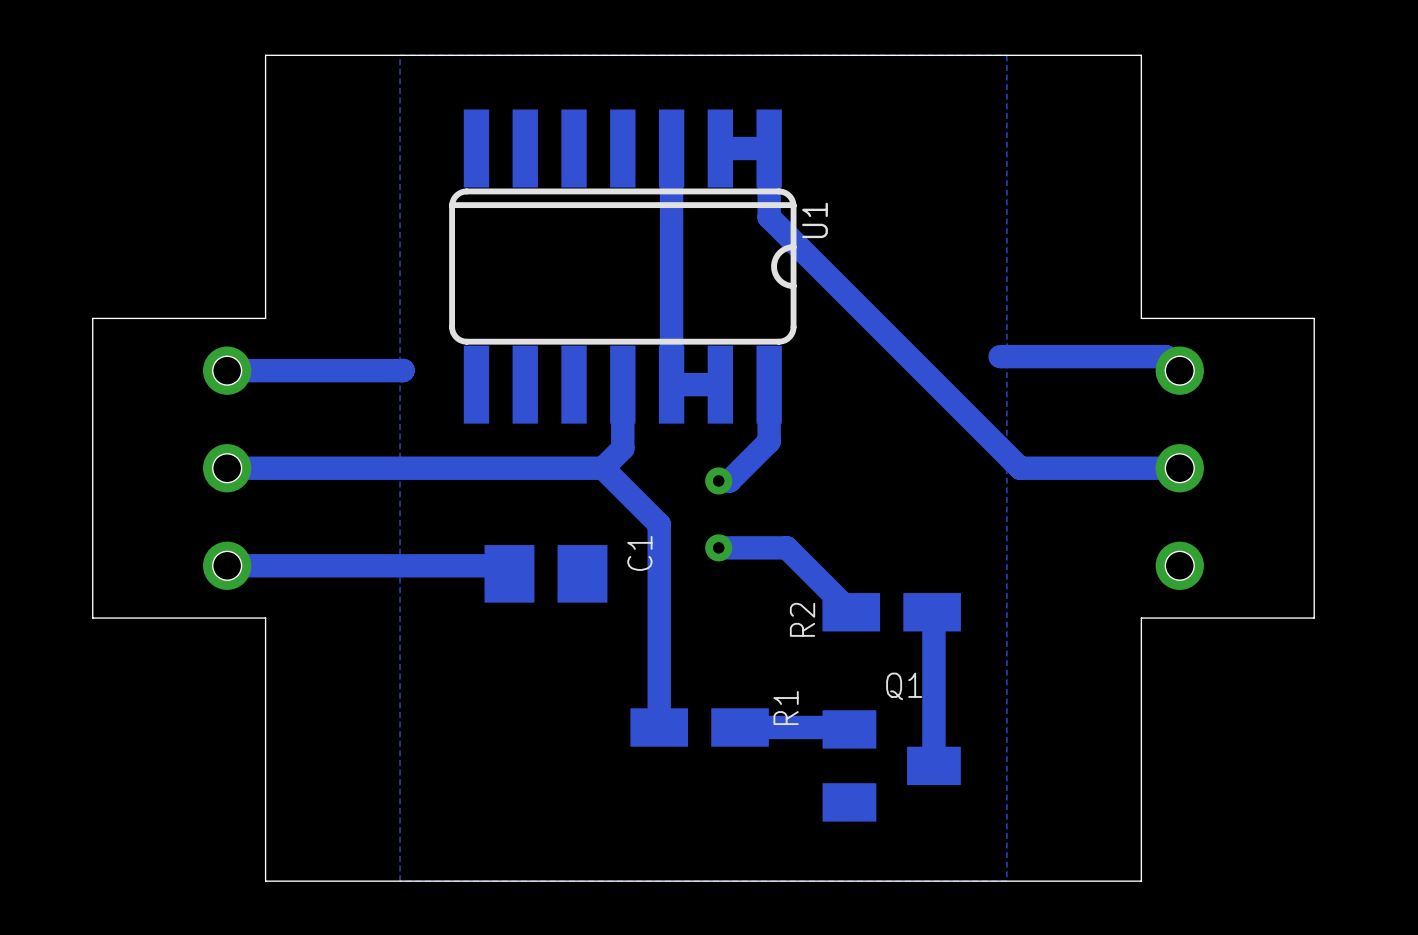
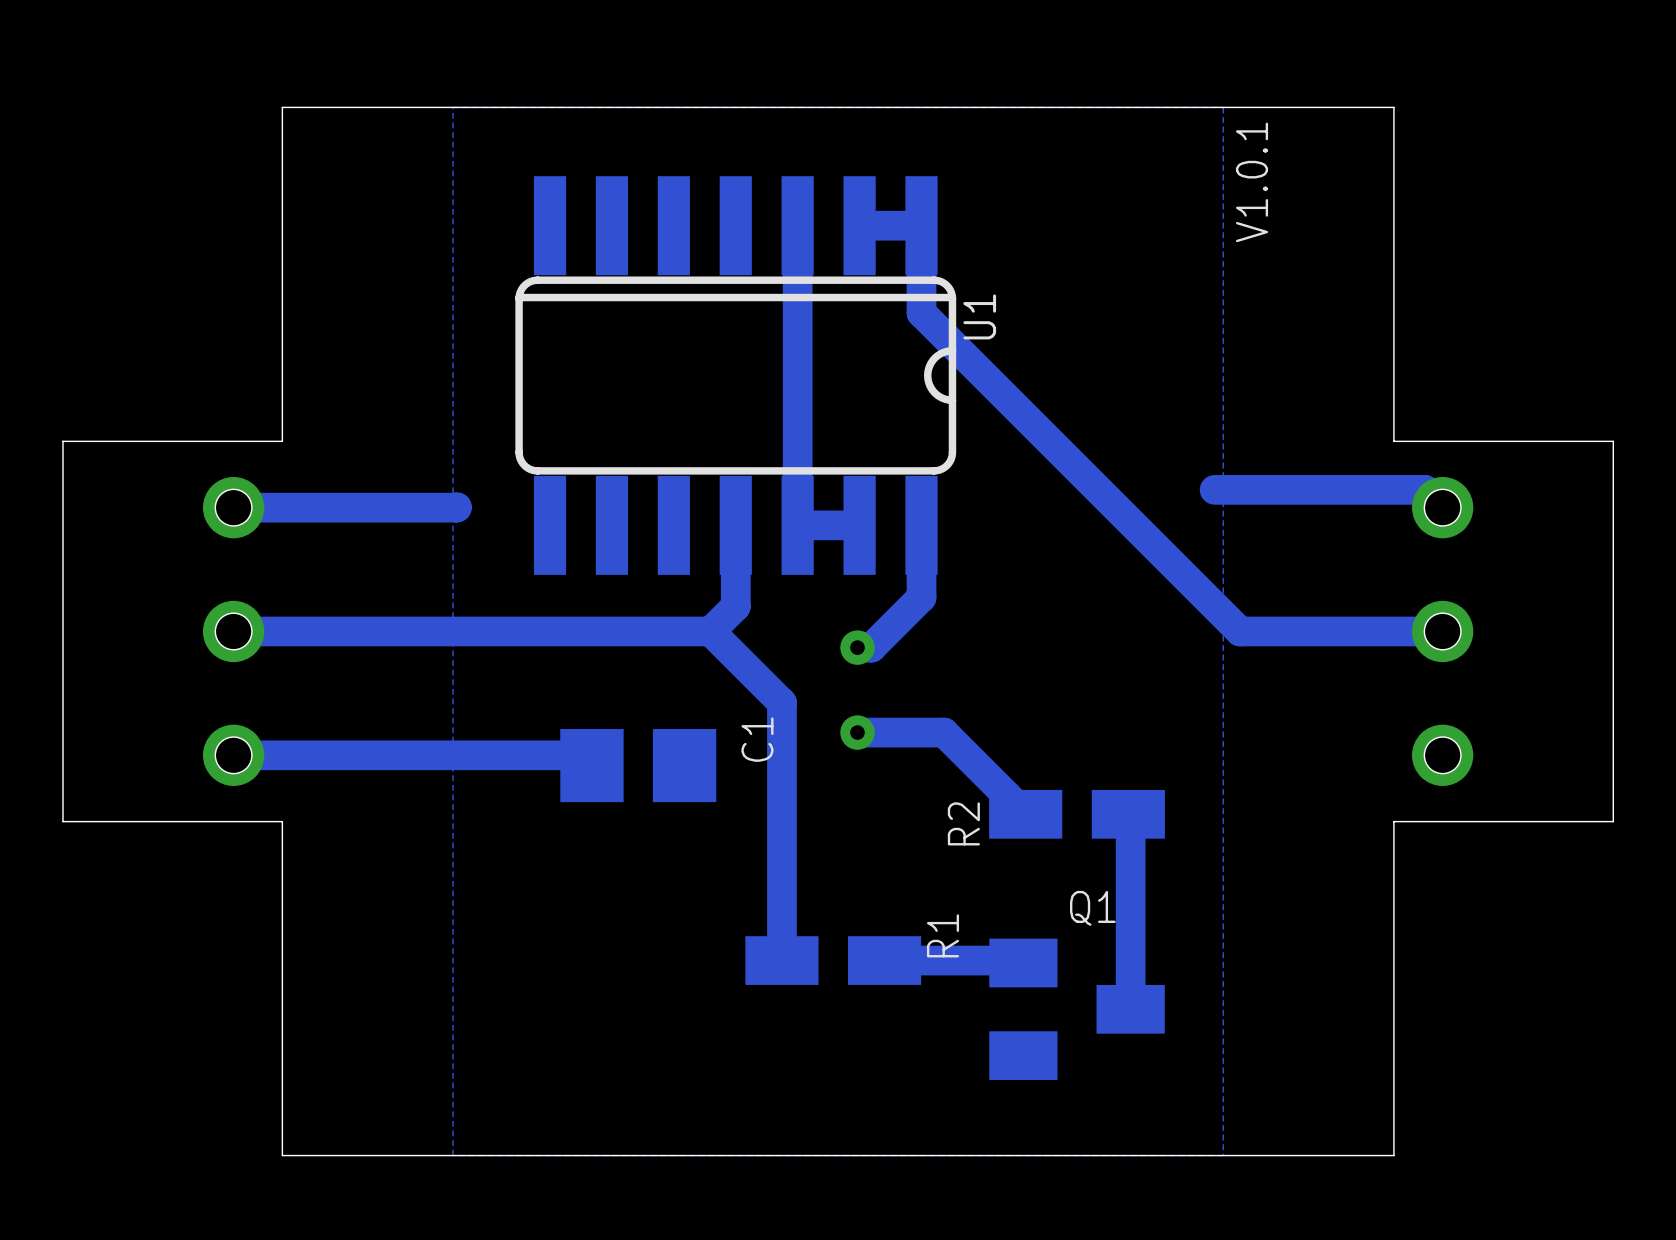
text: none -> V1.0.1 (1252, 182)

